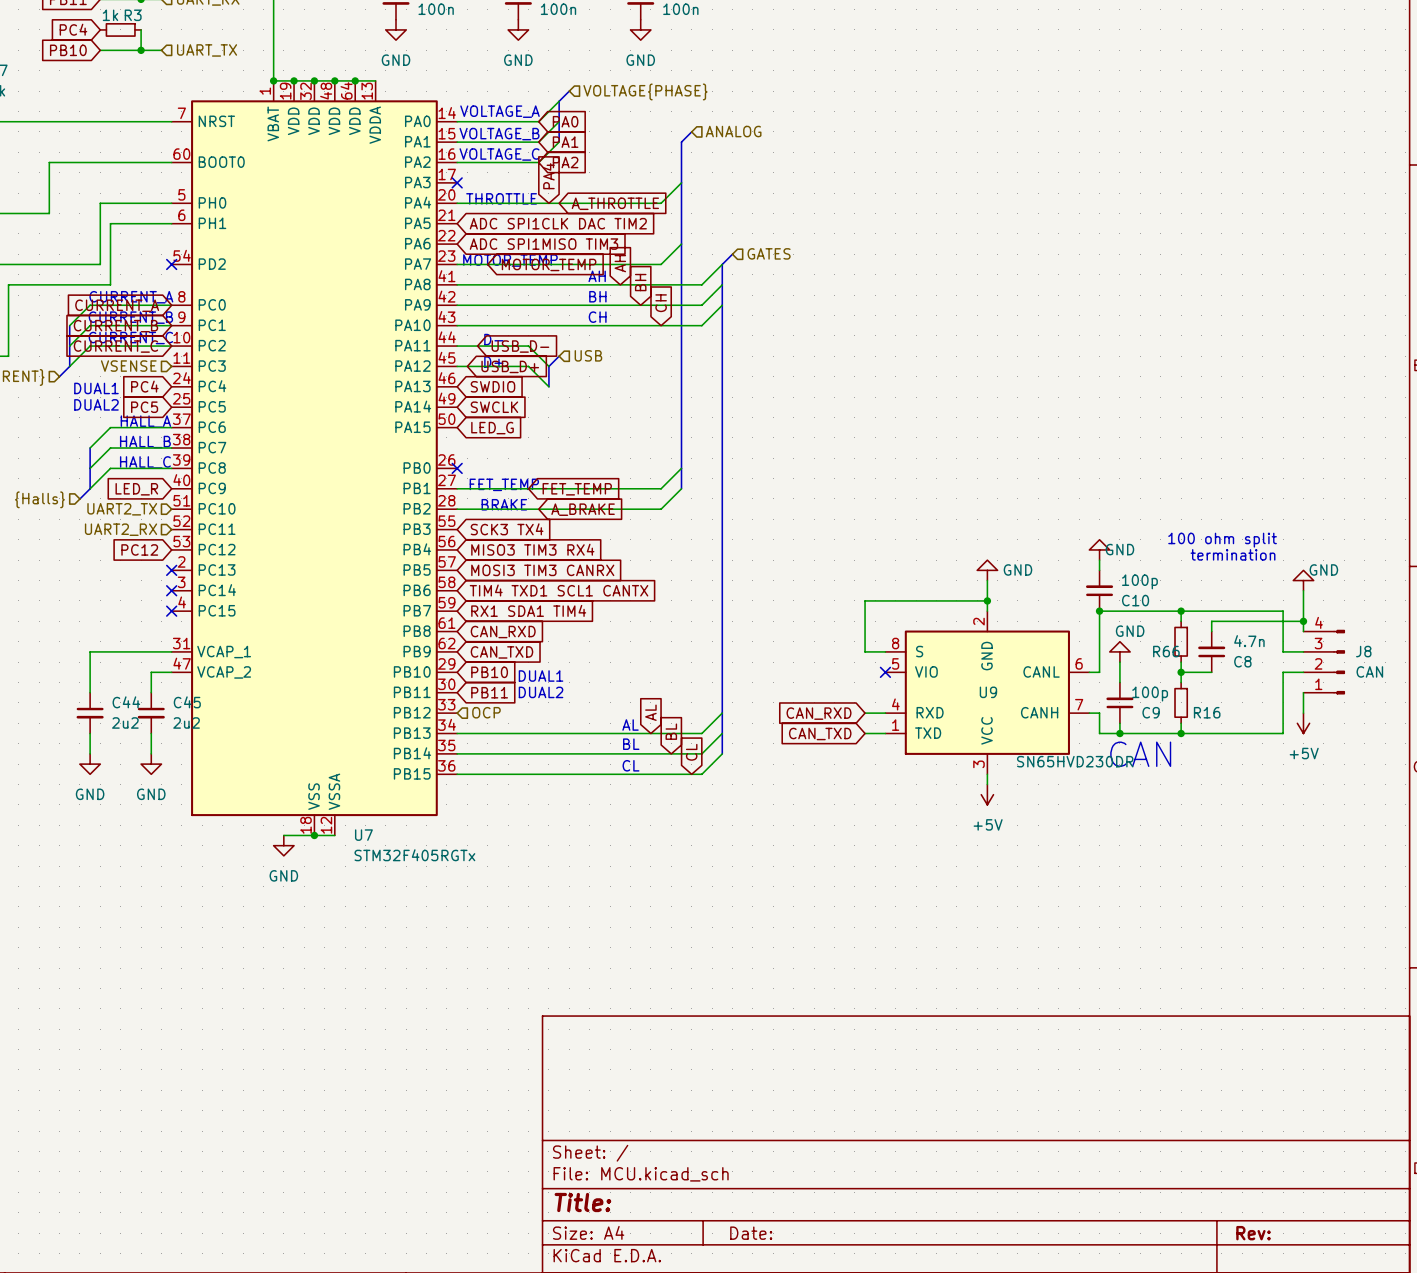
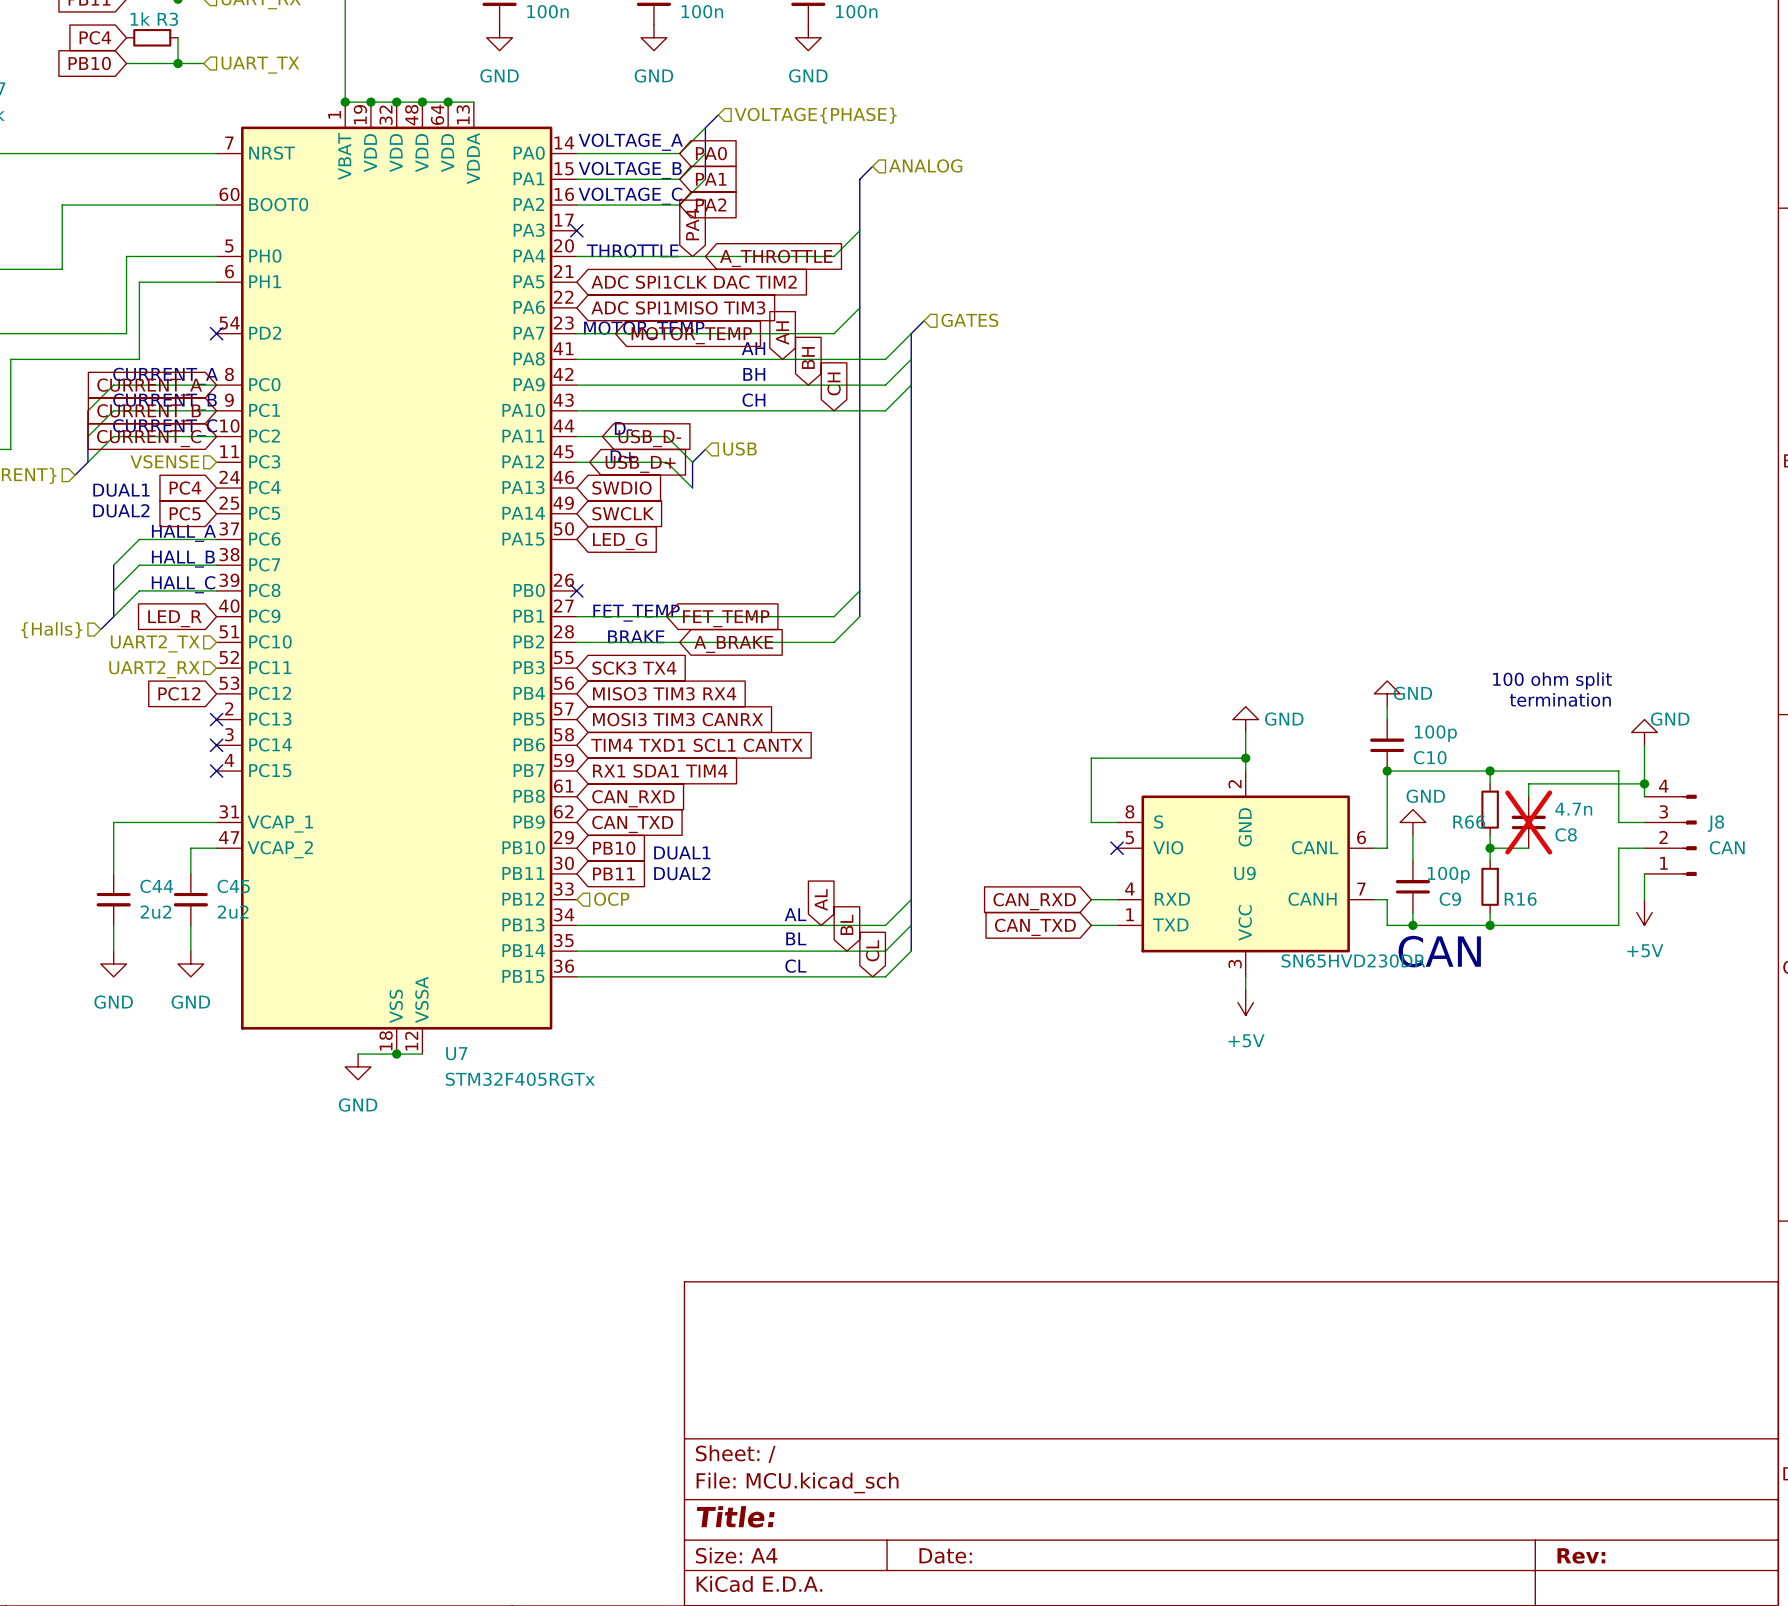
C8 do-not-place cross: none -> (1528, 822)

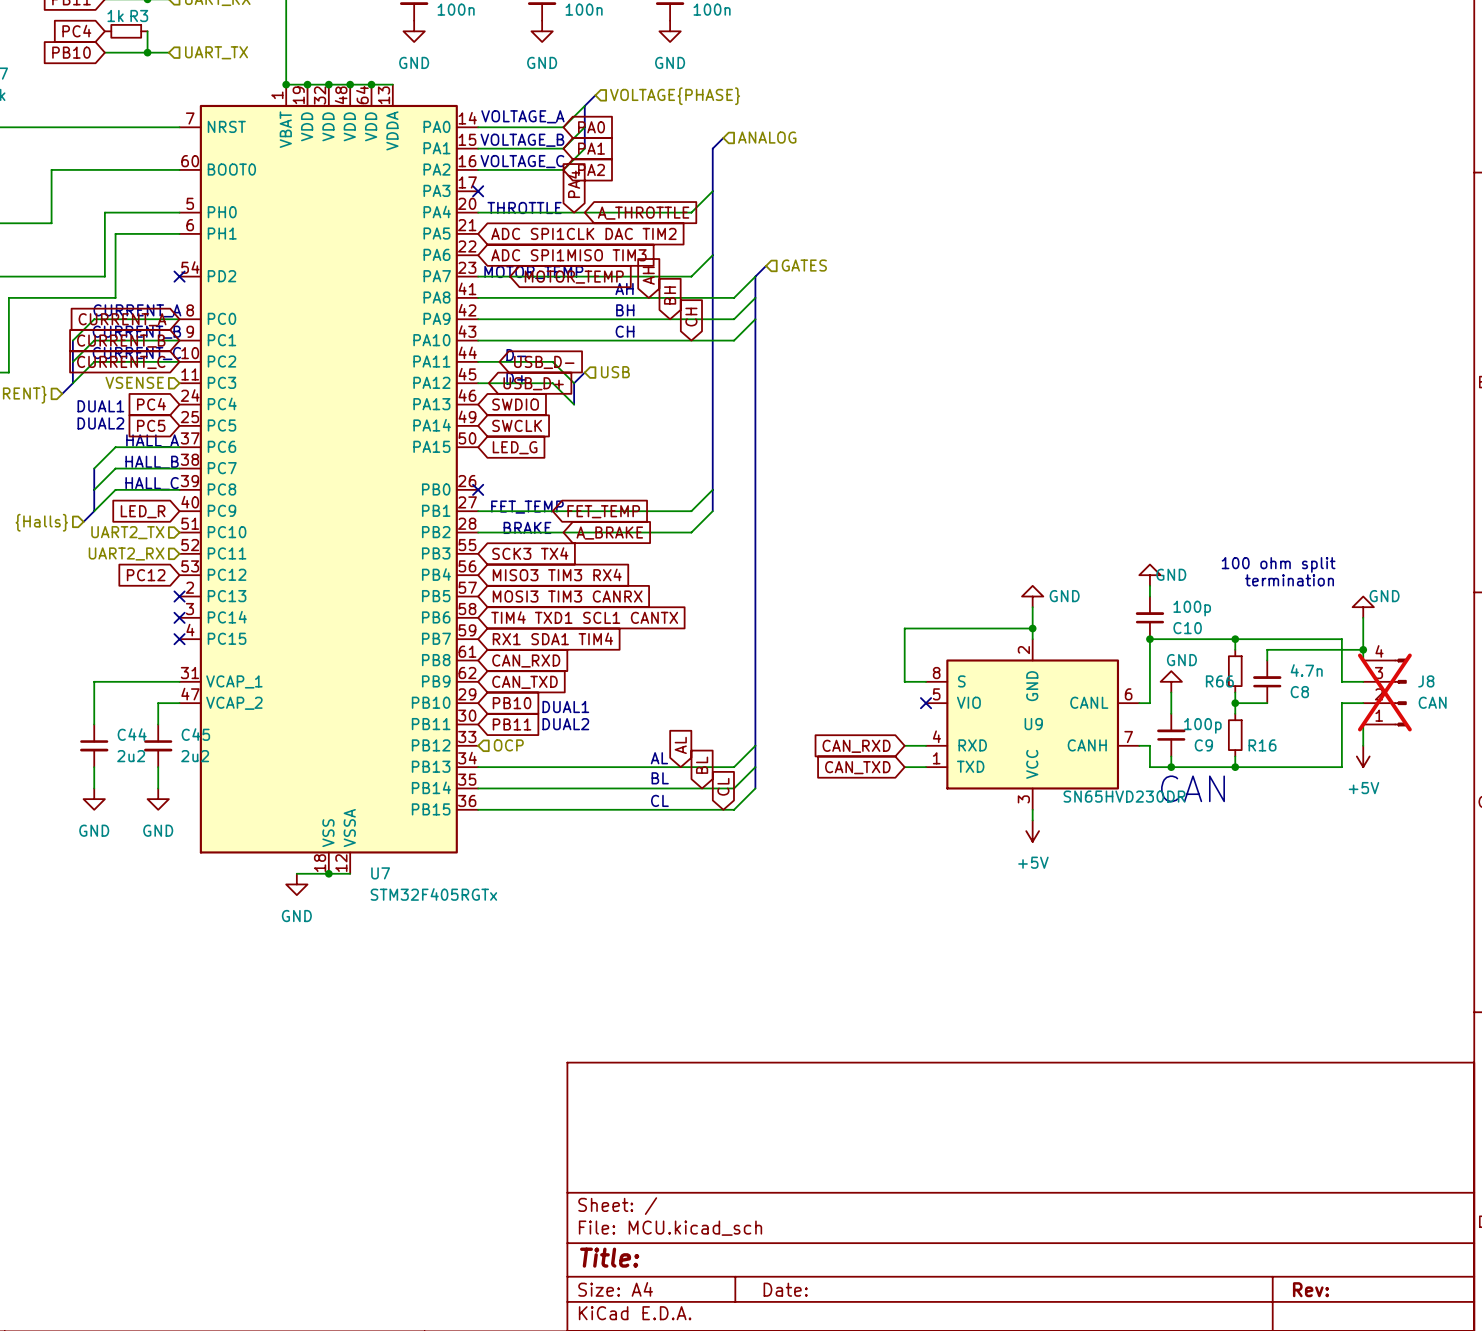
C8 do-not-place cross: (1528, 822) -> none
J8 do-not-place cross: none -> (1384, 692)

